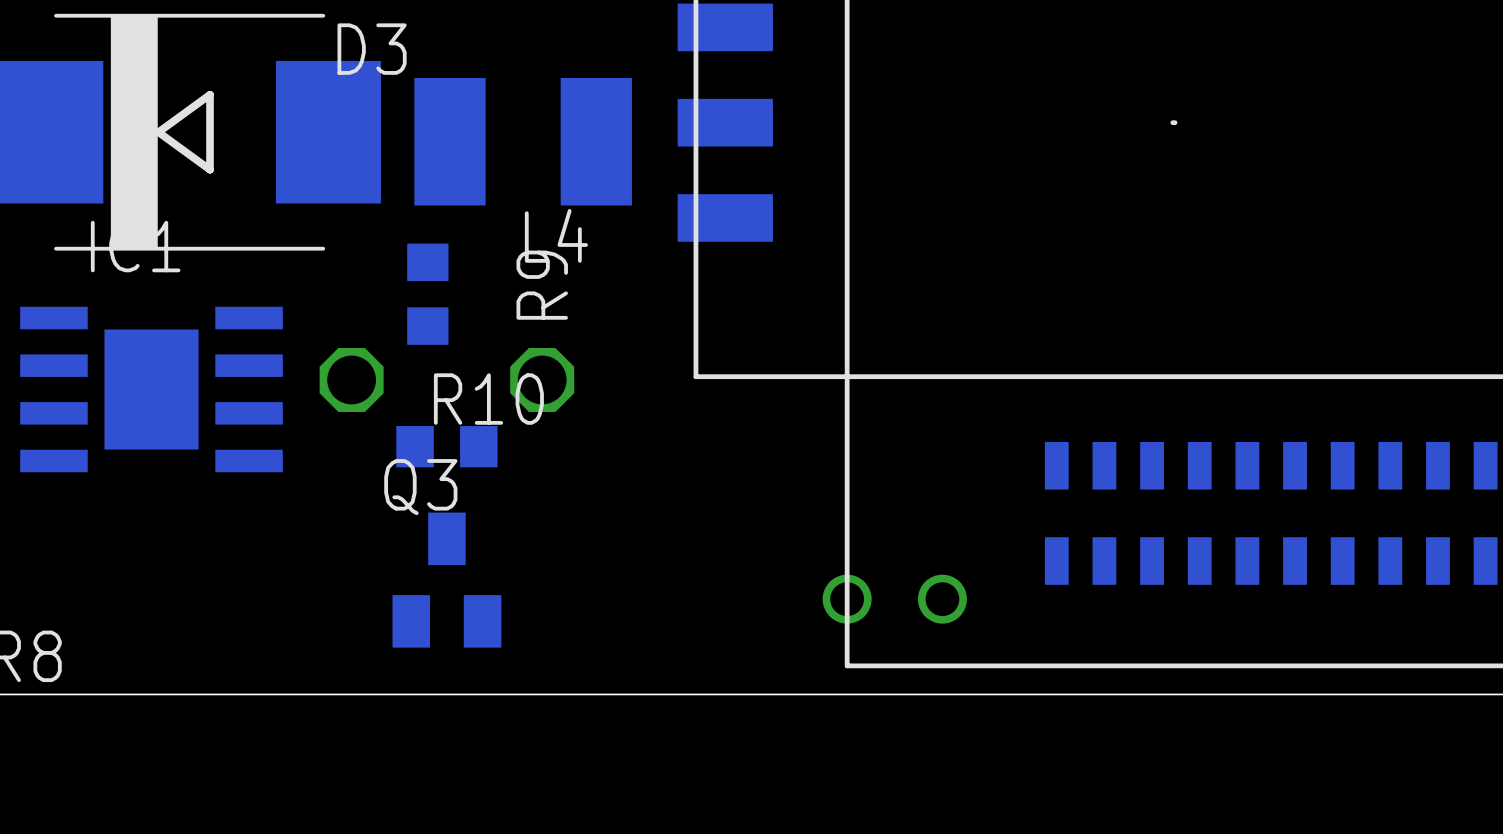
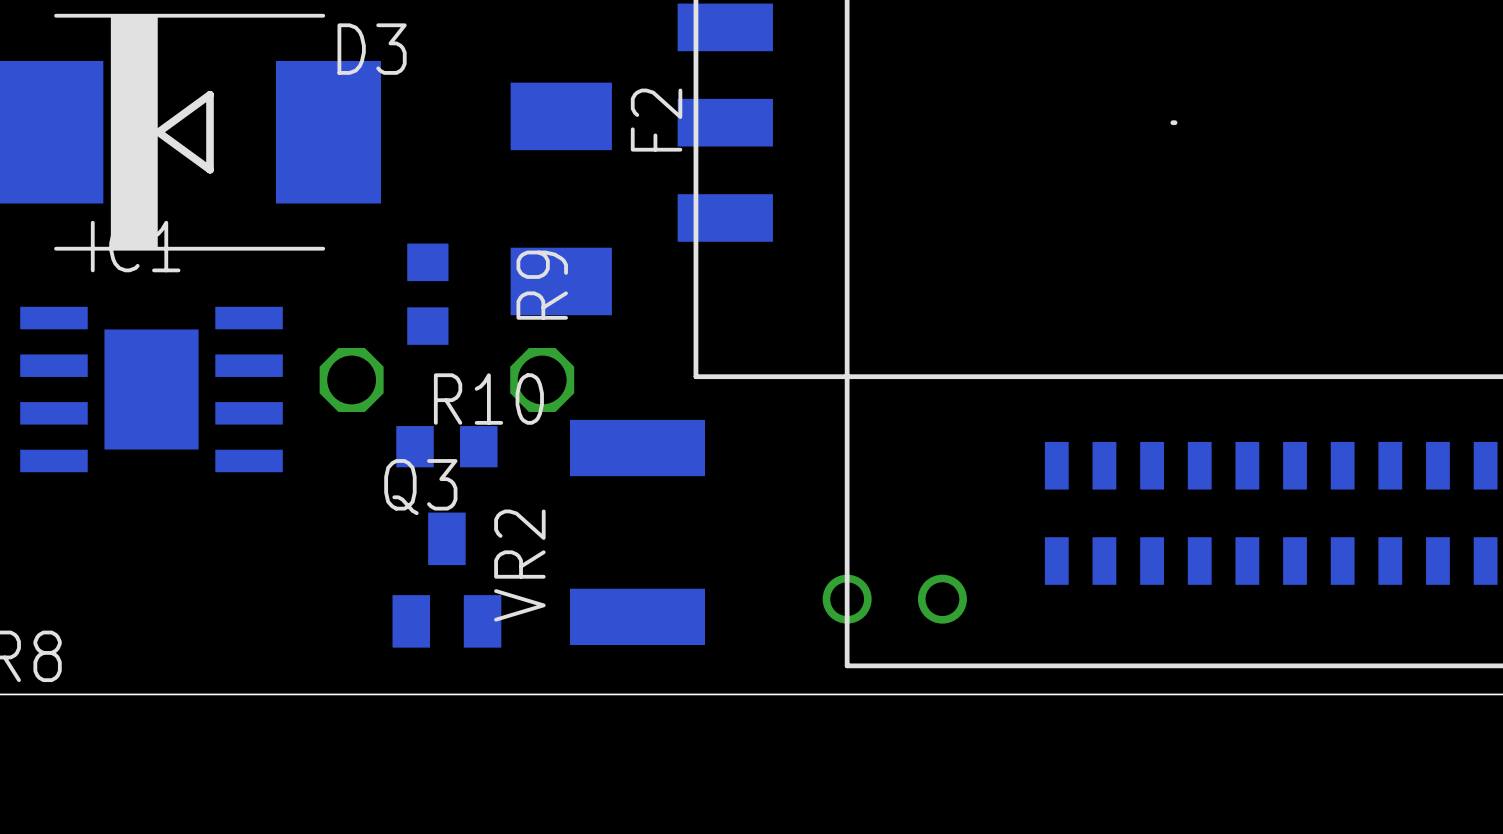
L4: (523, 141) -> none
F2: none -> (561, 198)
VR2: none -> (637, 532)

